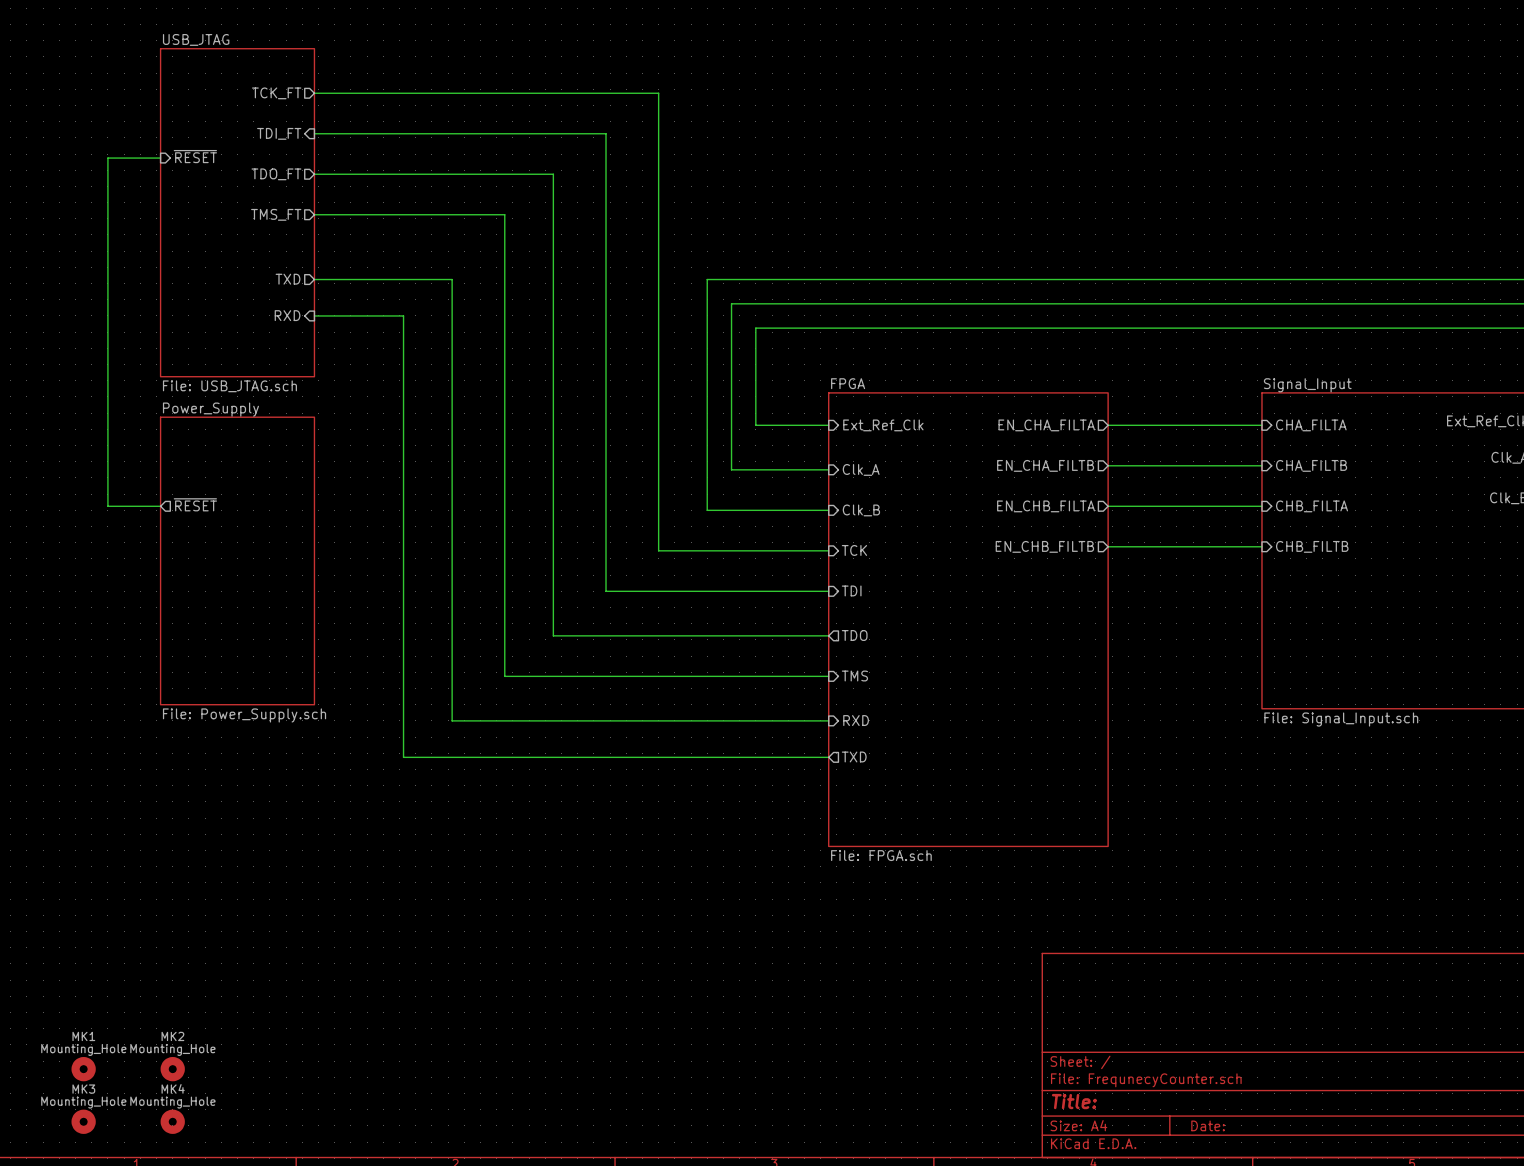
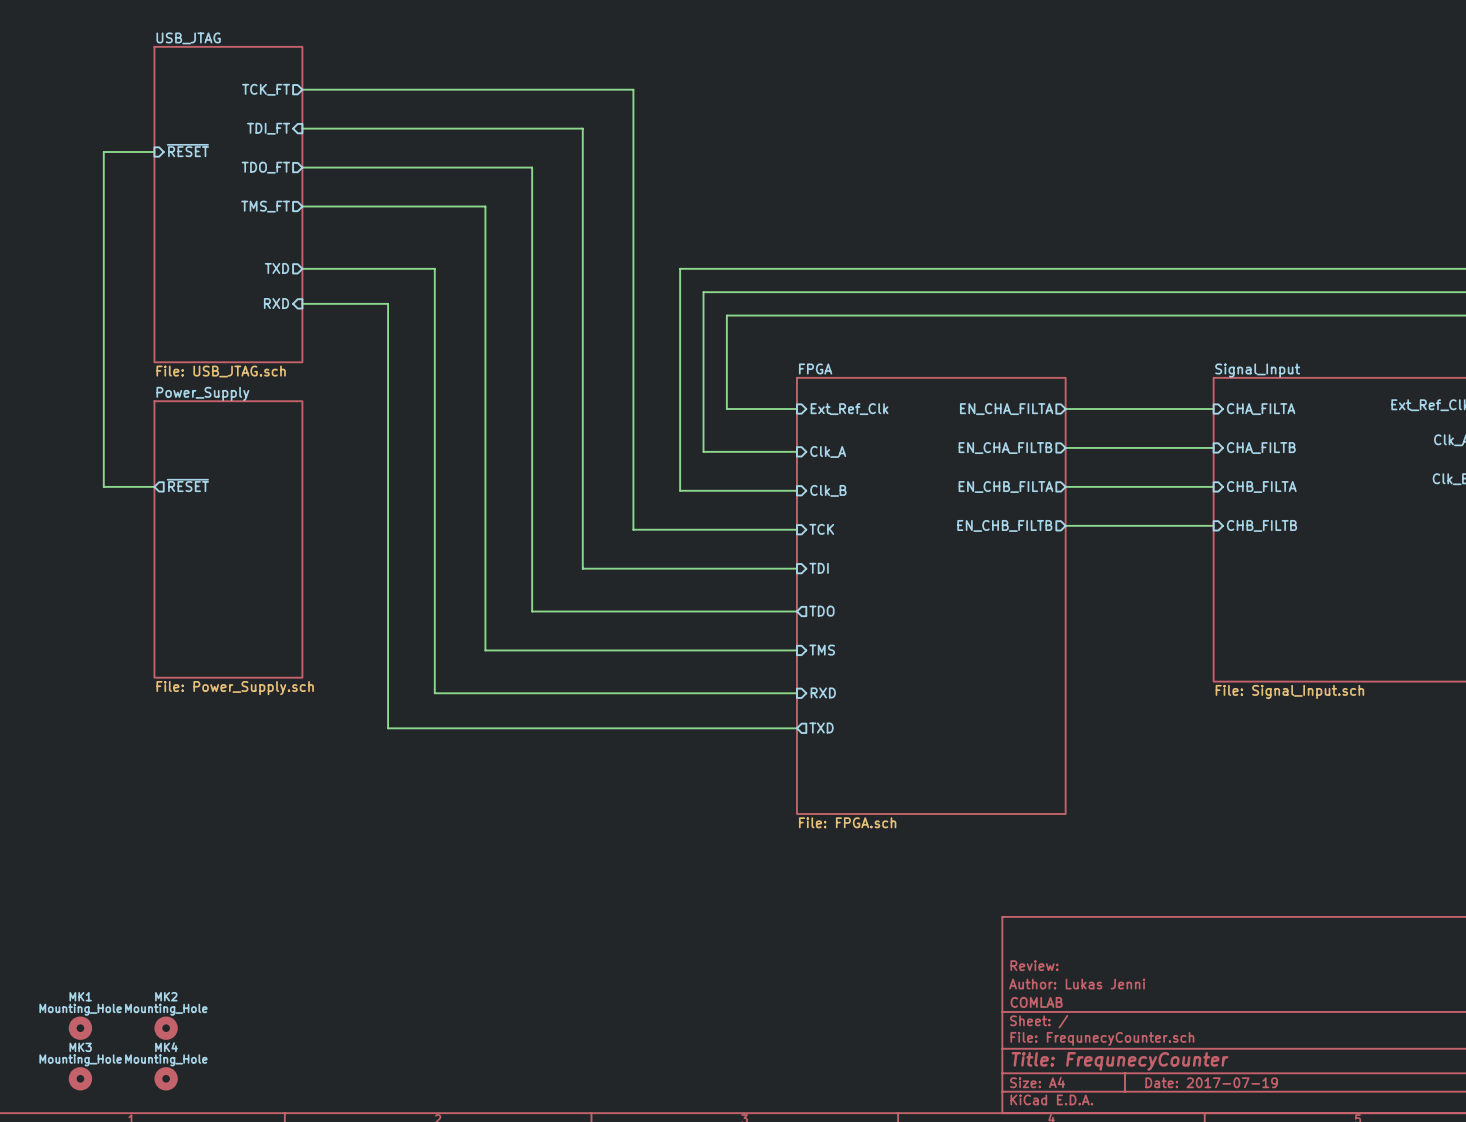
title block: none -> Review: (1034, 965)
title block: none -> Author: Lukas Jenni (1077, 984)
title block: none -> COMLAB (1036, 1002)
title block: Title: (1074, 1101) -> Title: FrequnecyCounter (1120, 1061)
title block: Date: (1208, 1125) -> Date: 2017-07-19 (1211, 1082)

